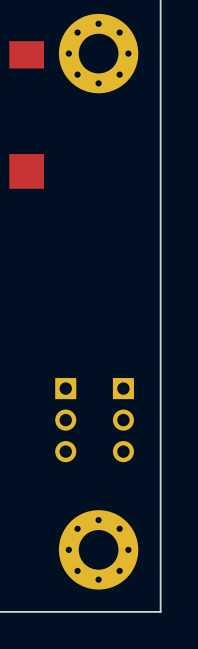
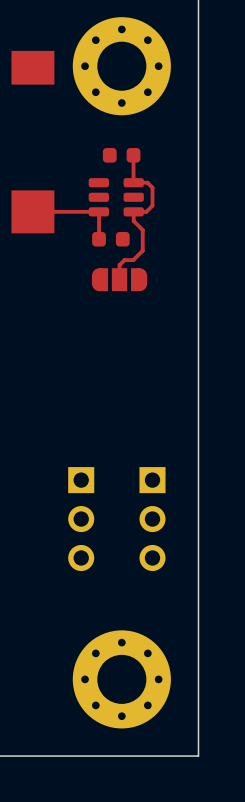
part: none -> (121, 155)
top track: none -> (133, 155) (133, 182)
top track: none -> (133, 182) (147, 182) (152, 187) (152, 205) (146, 211) (133, 211) (133, 221) (142, 230) (142, 250) (133, 260) (124, 260) (119, 265) (119, 279)
part: none -> (116, 197)
top track: none -> (98, 211) (32, 211)
top track: none -> (99, 212) (99, 239)
part: none -> (110, 239)
part: none -> (119, 279)

